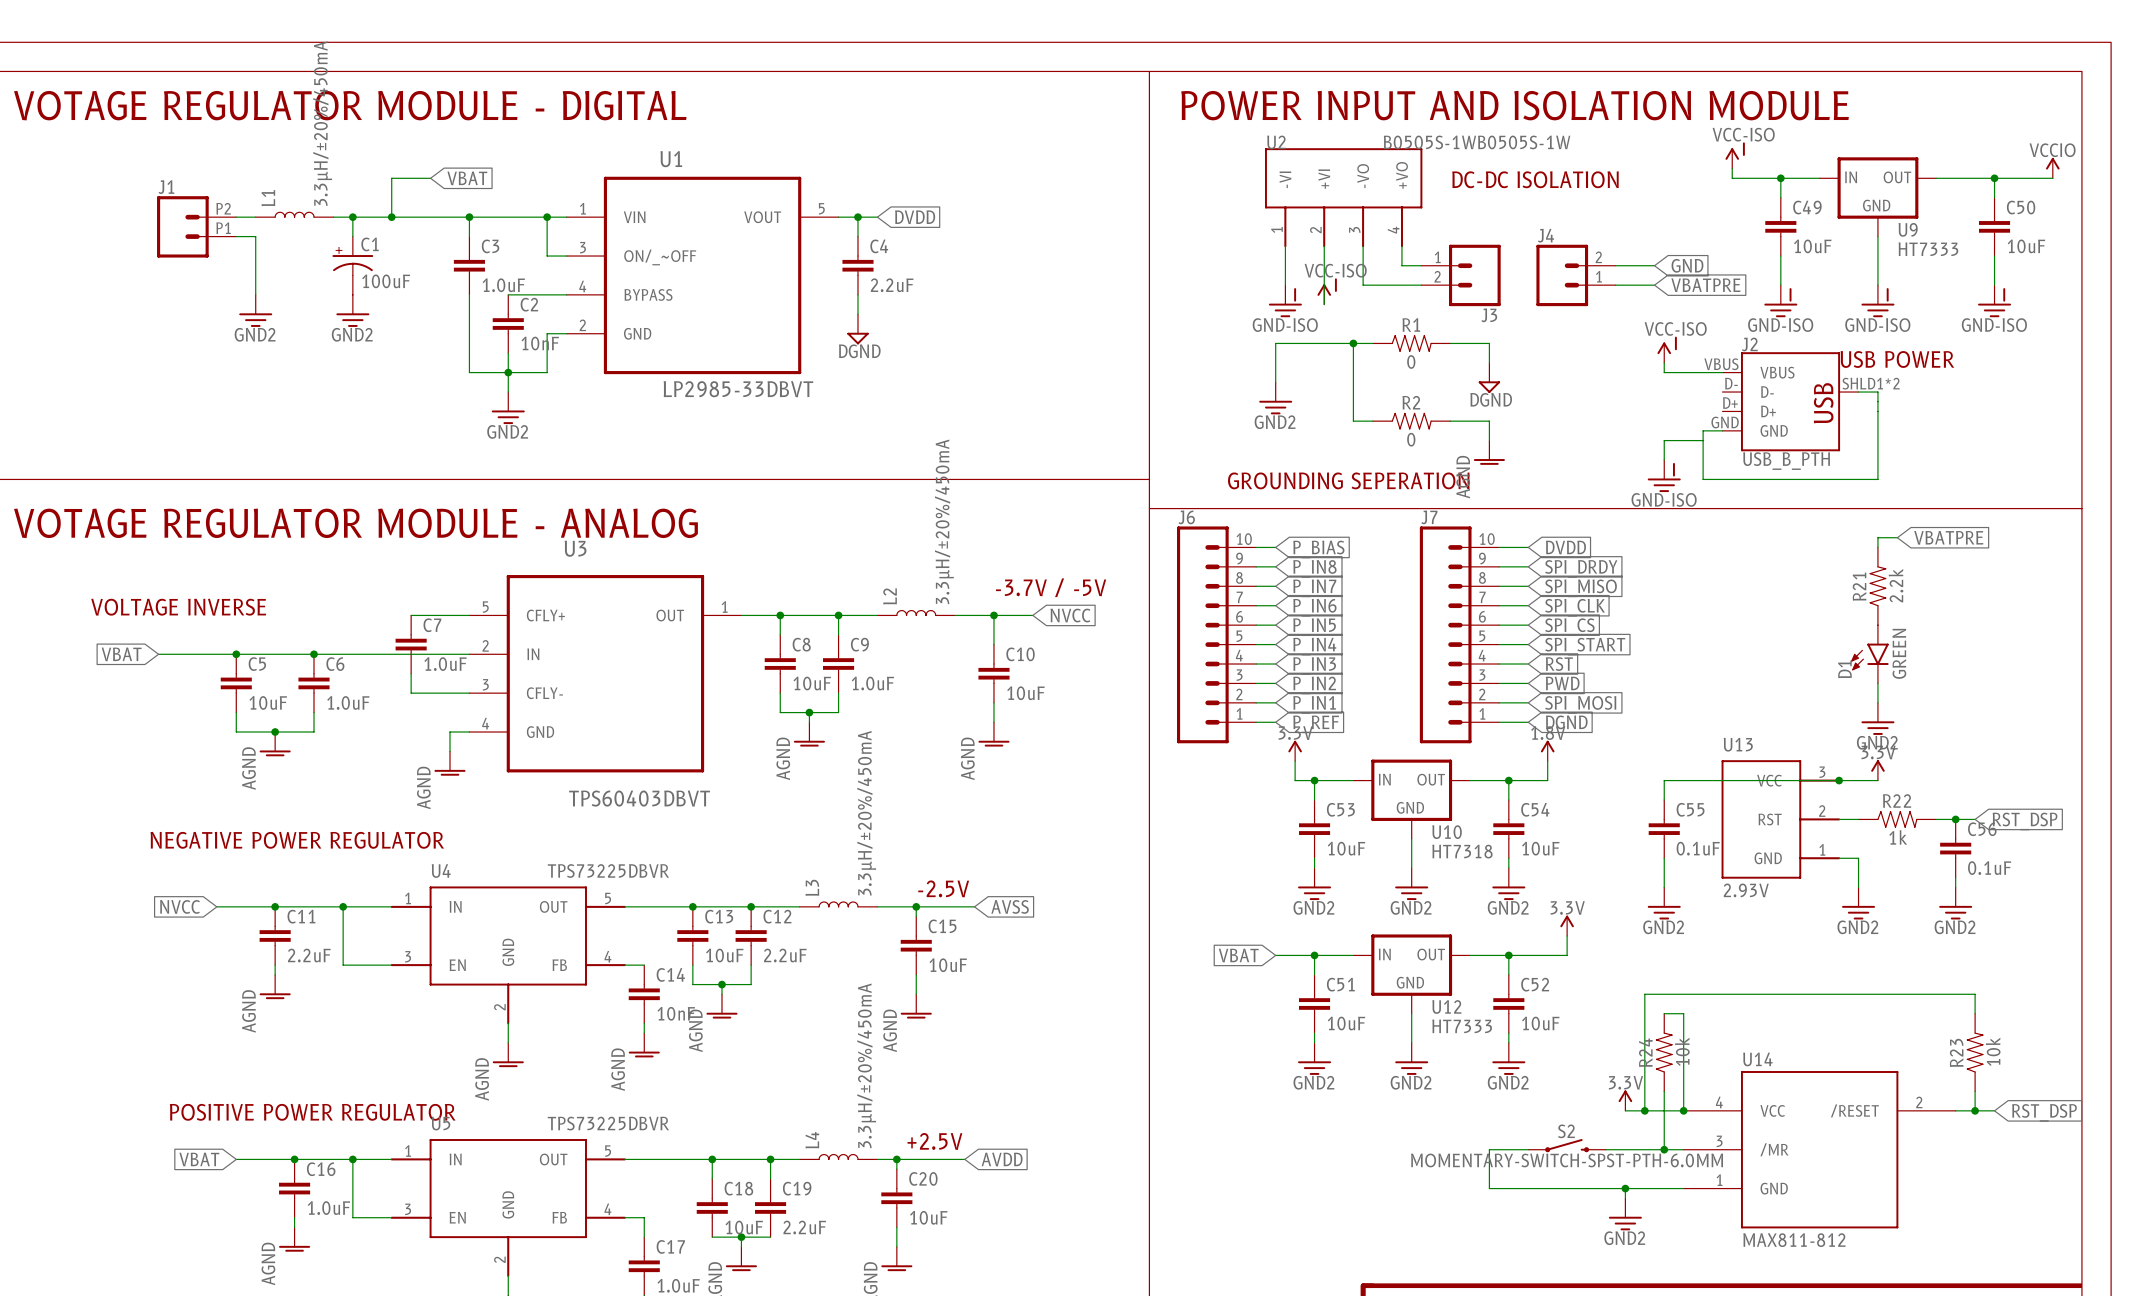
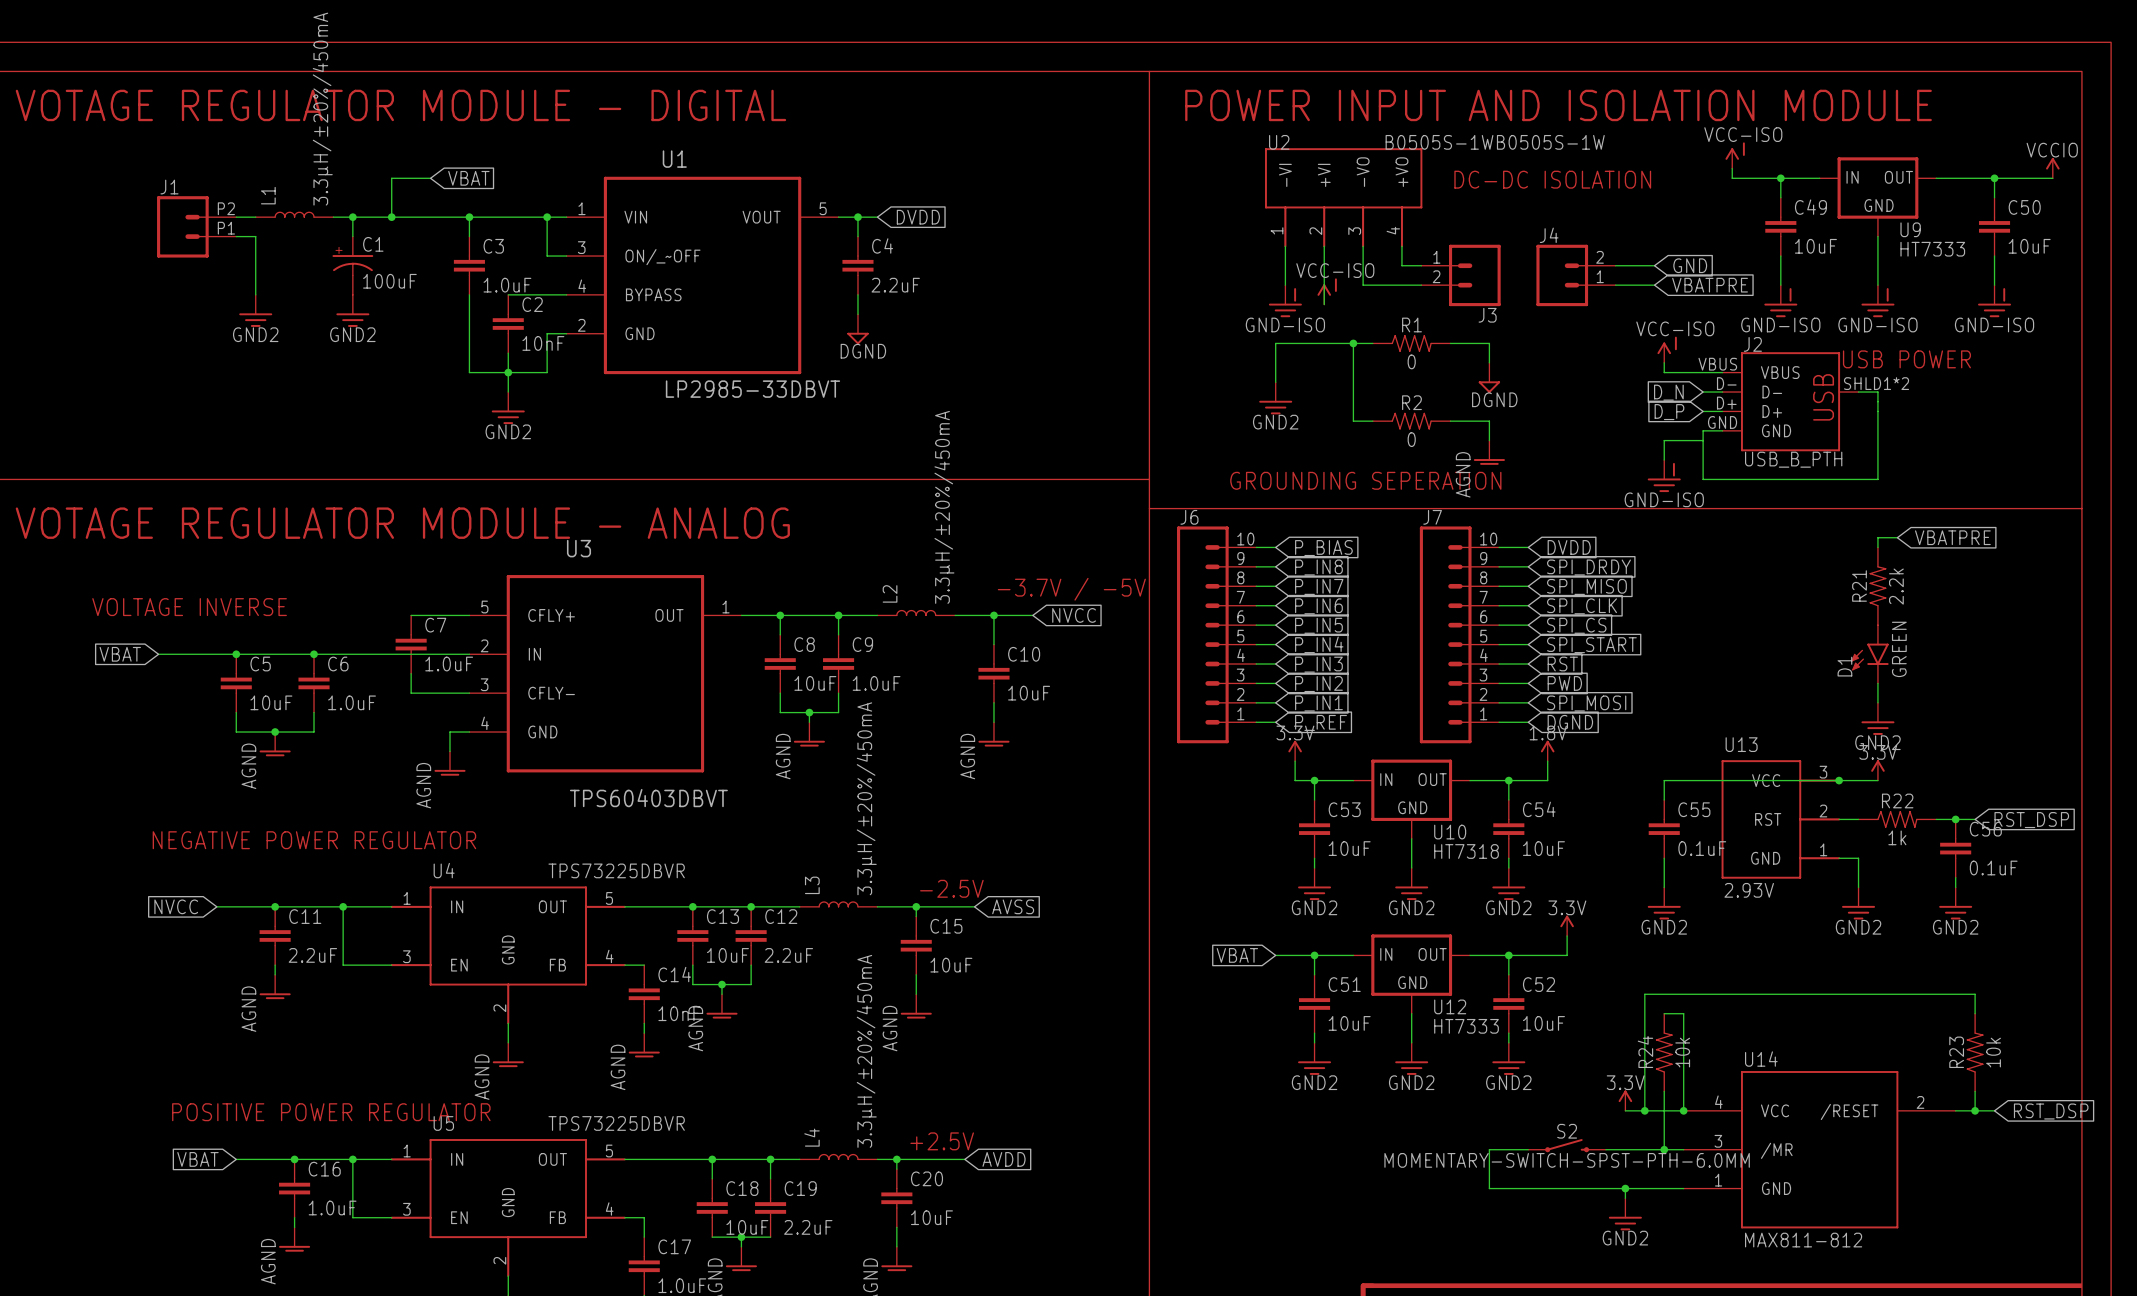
wire: none -> (1703, 392) (1722, 392)
global label: none -> D_N (1668, 392)
wire: none -> (1703, 411) (1722, 411)
global label: none -> D_P (1669, 412)

